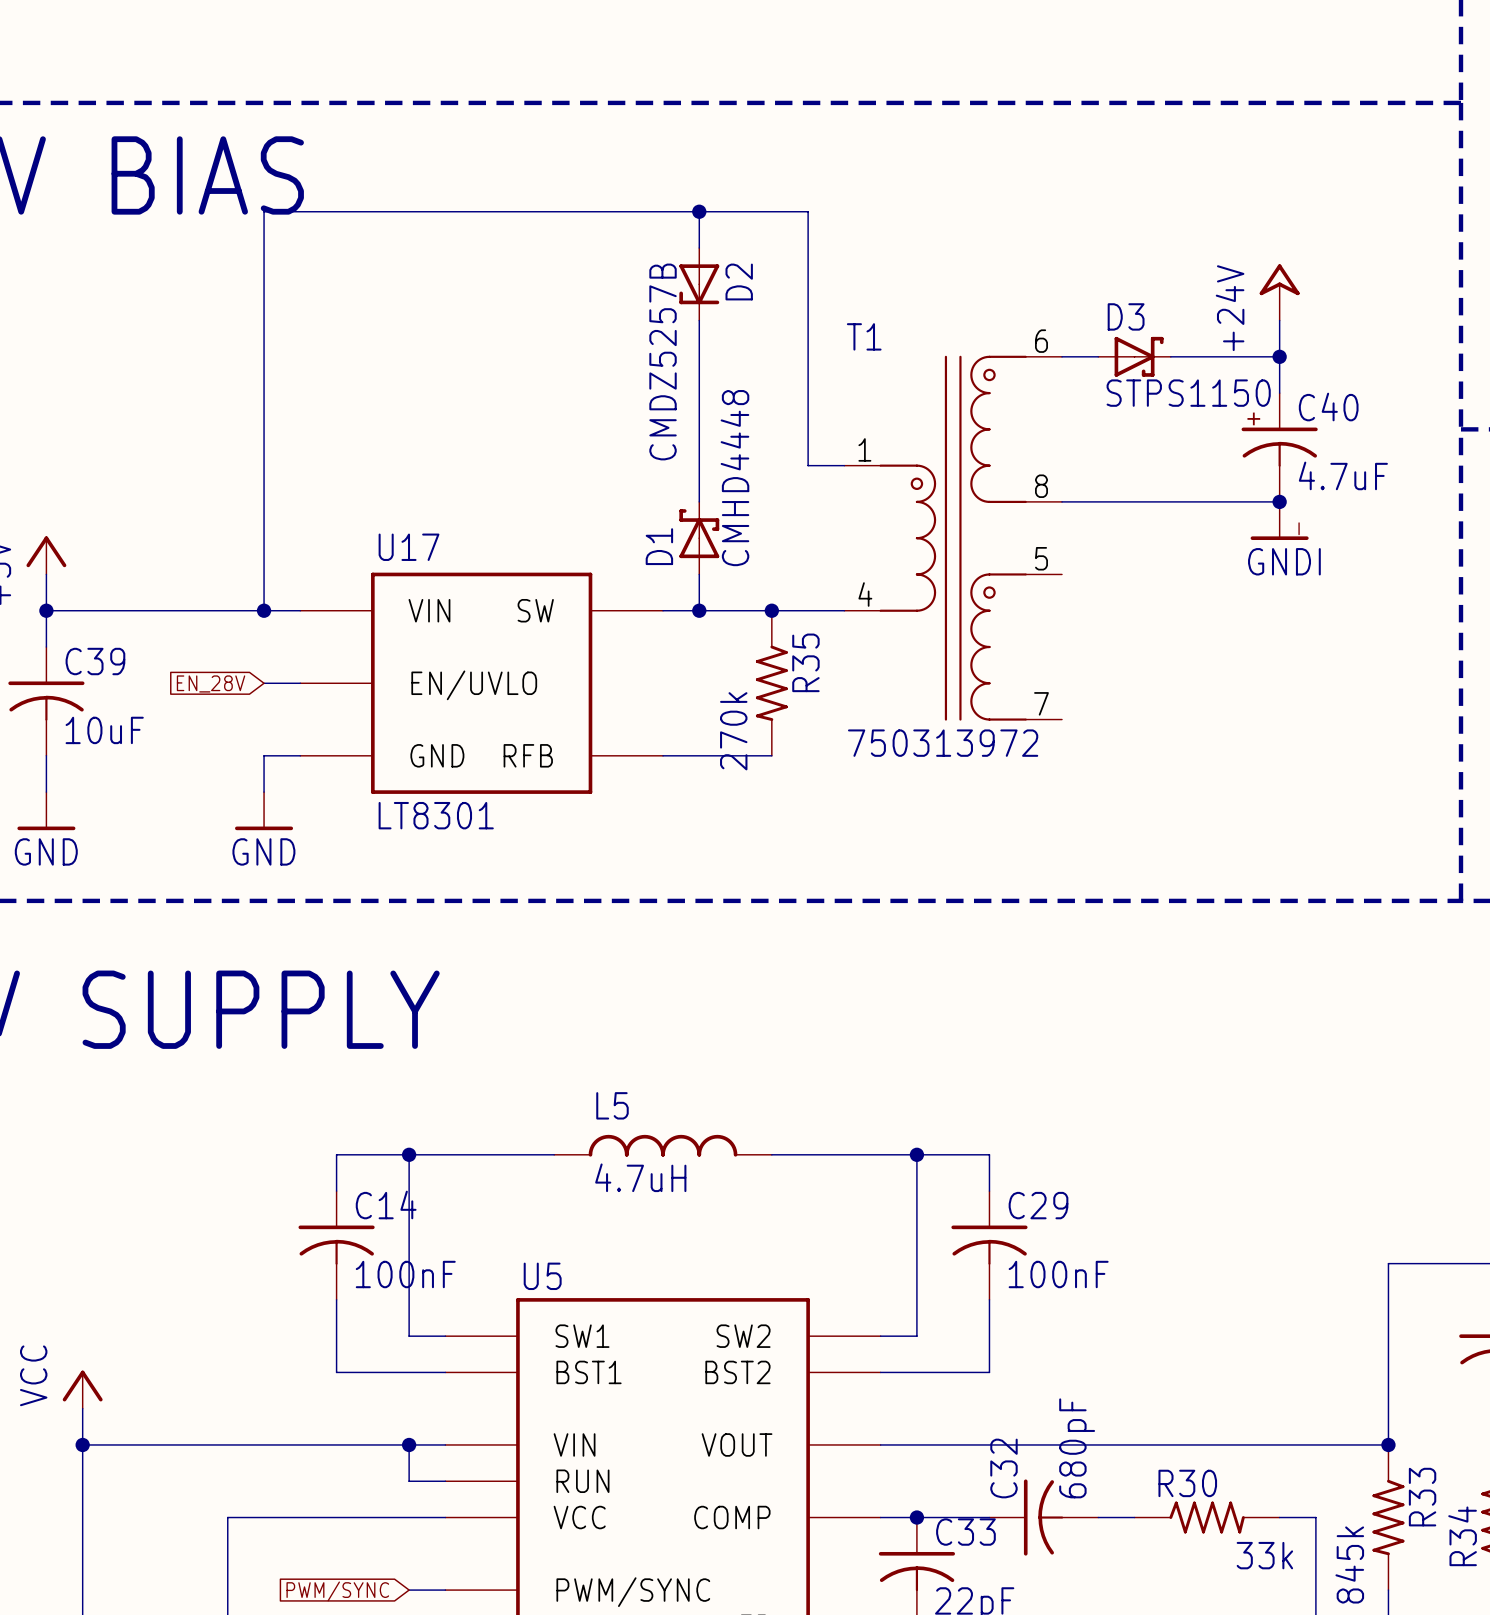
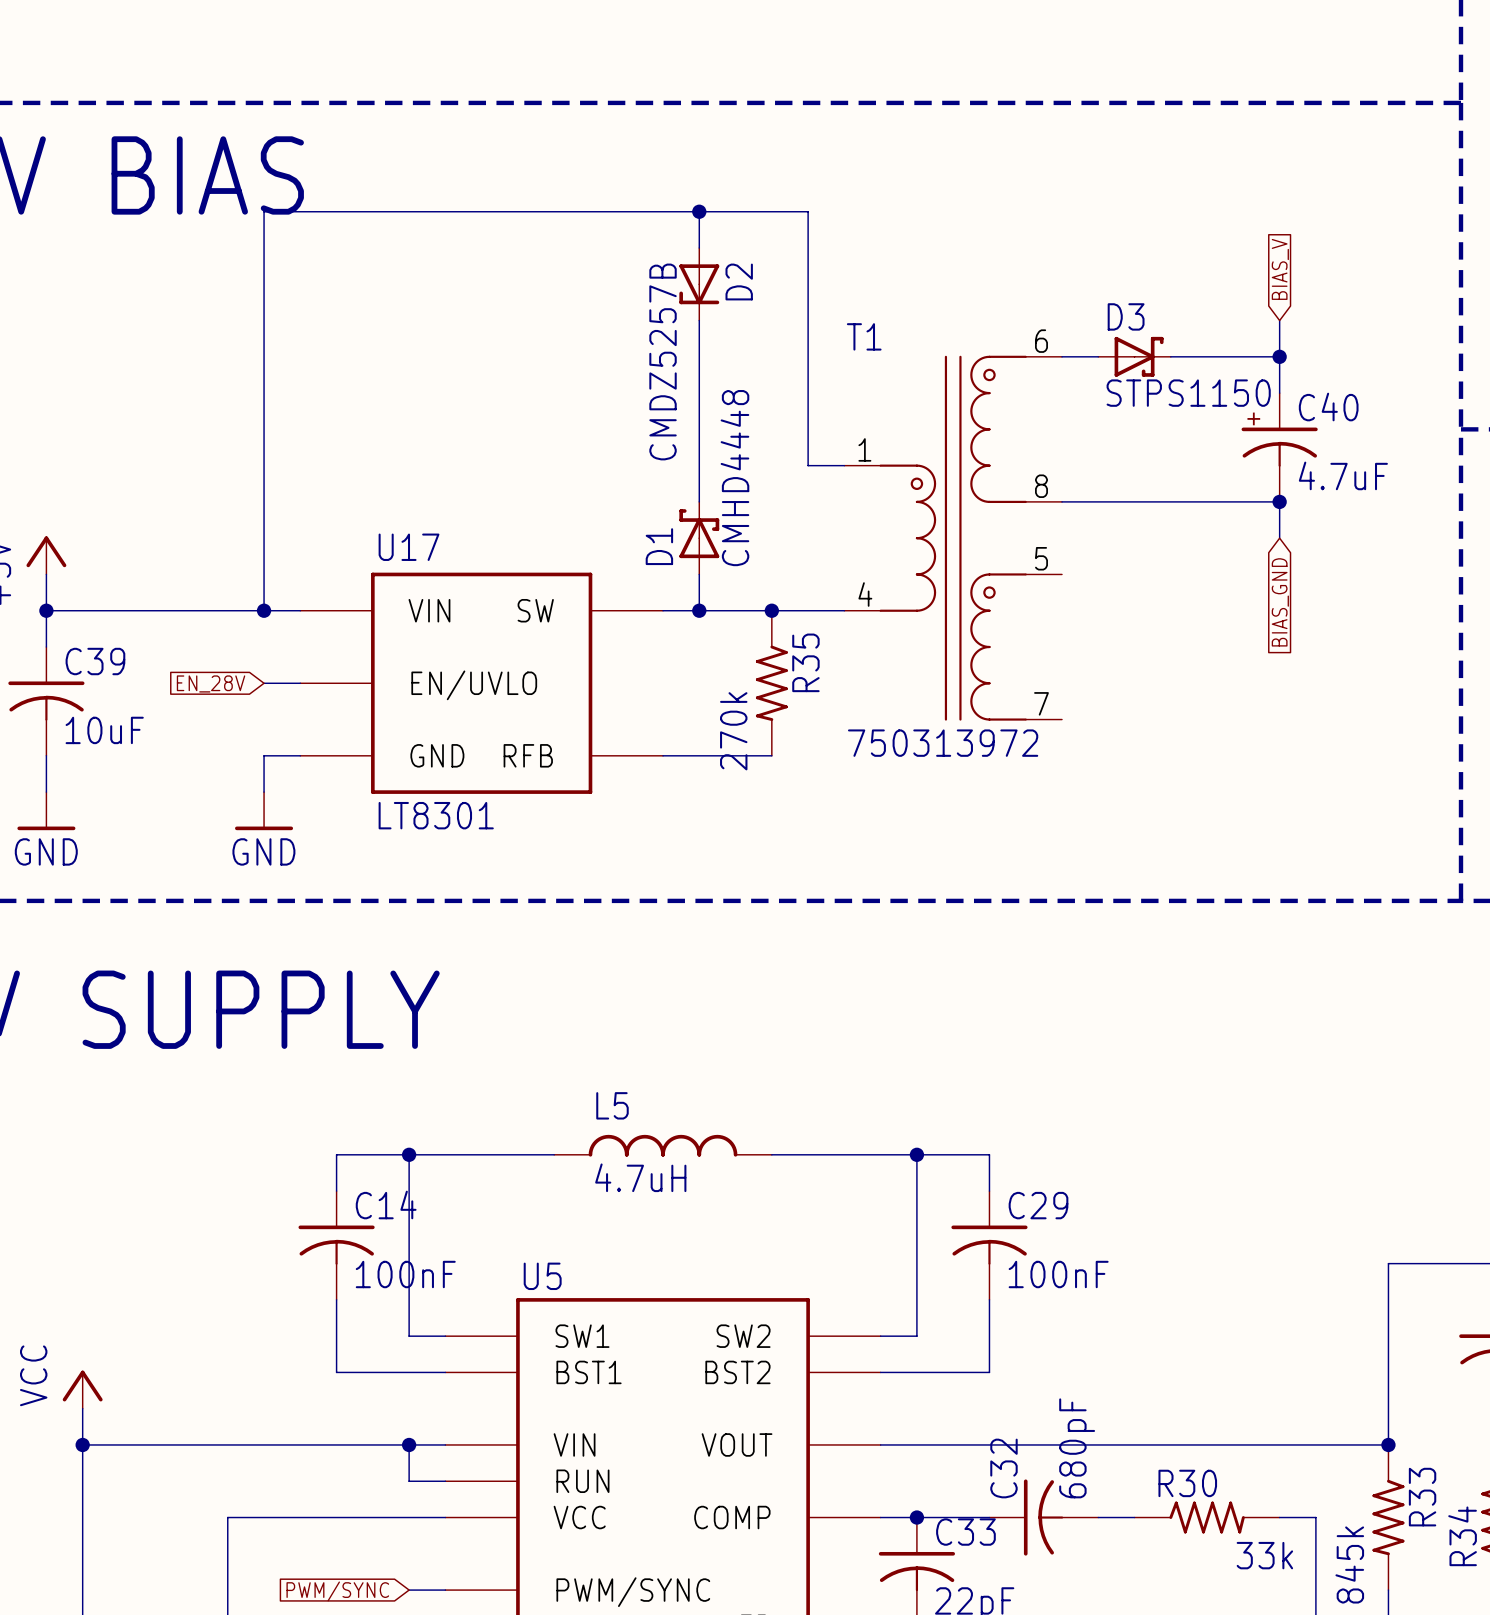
global label: none -> BIAS_V (1280, 269)
power symbol: +24V (1279, 292) -> none
power symbol: GNDI (1279, 520) -> none
global label: none -> BIAS_GND (1280, 602)

